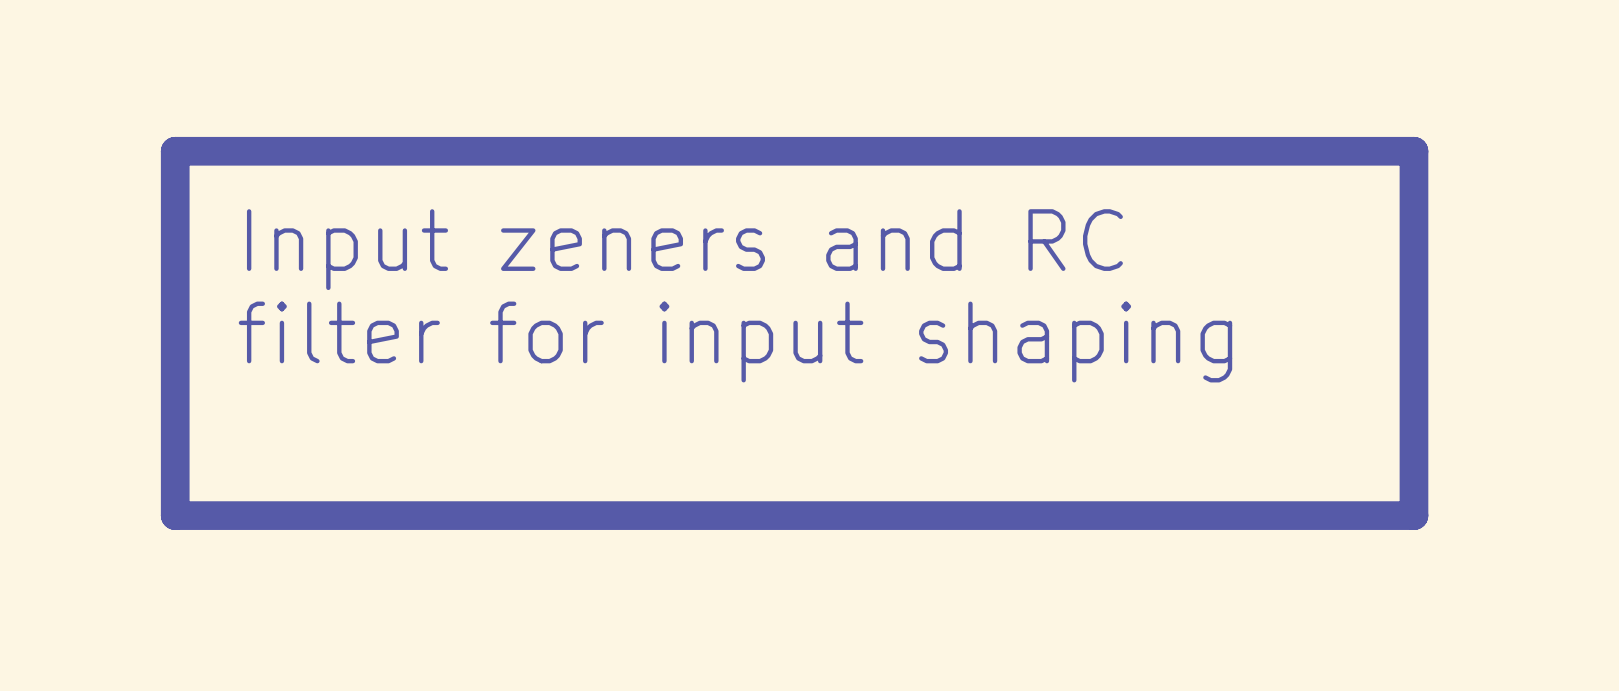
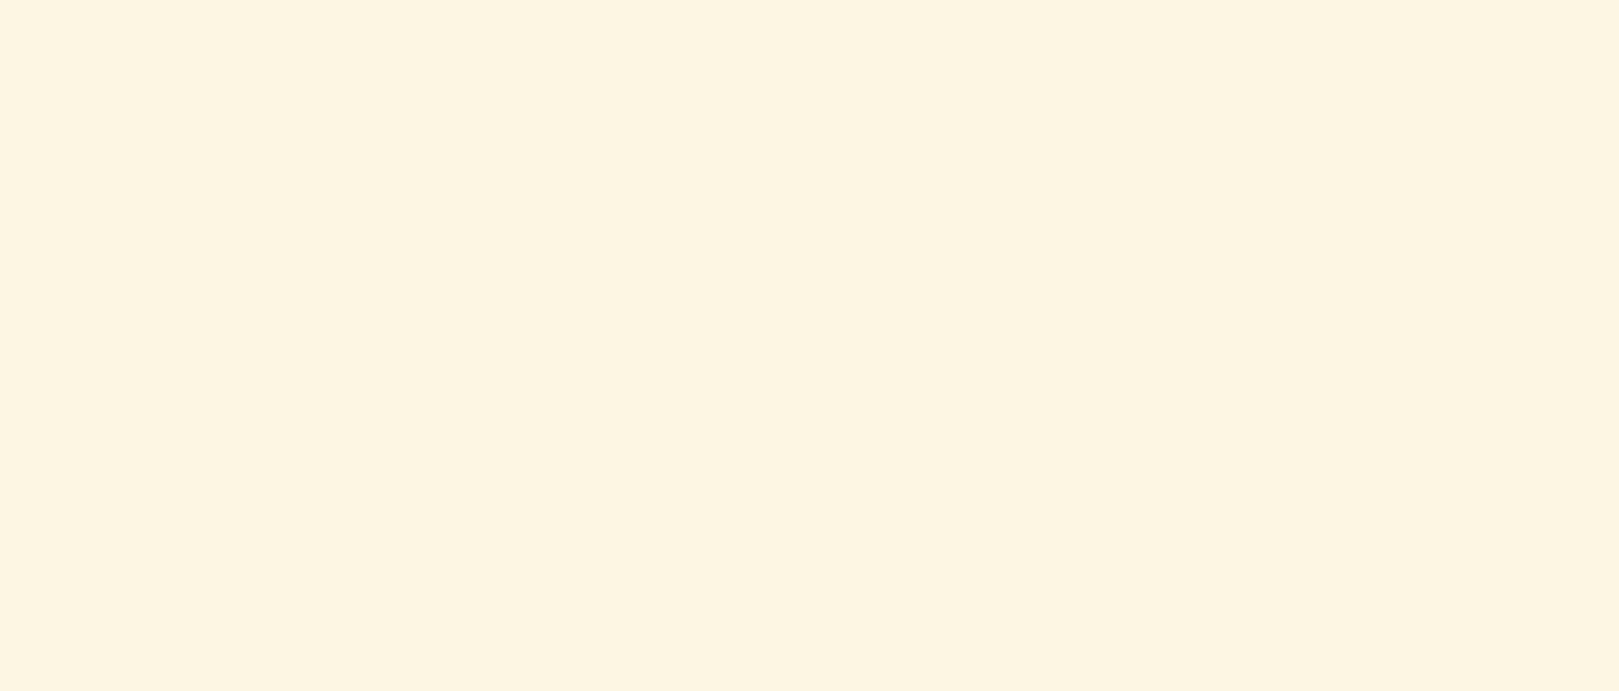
line: (175, 151) (1413, 151) (1413, 515) (175, 515) (175, 151) -> none
text: Input zeners and RC (684, 249) -> none
text: filter for input shaping (735, 342) -> none

